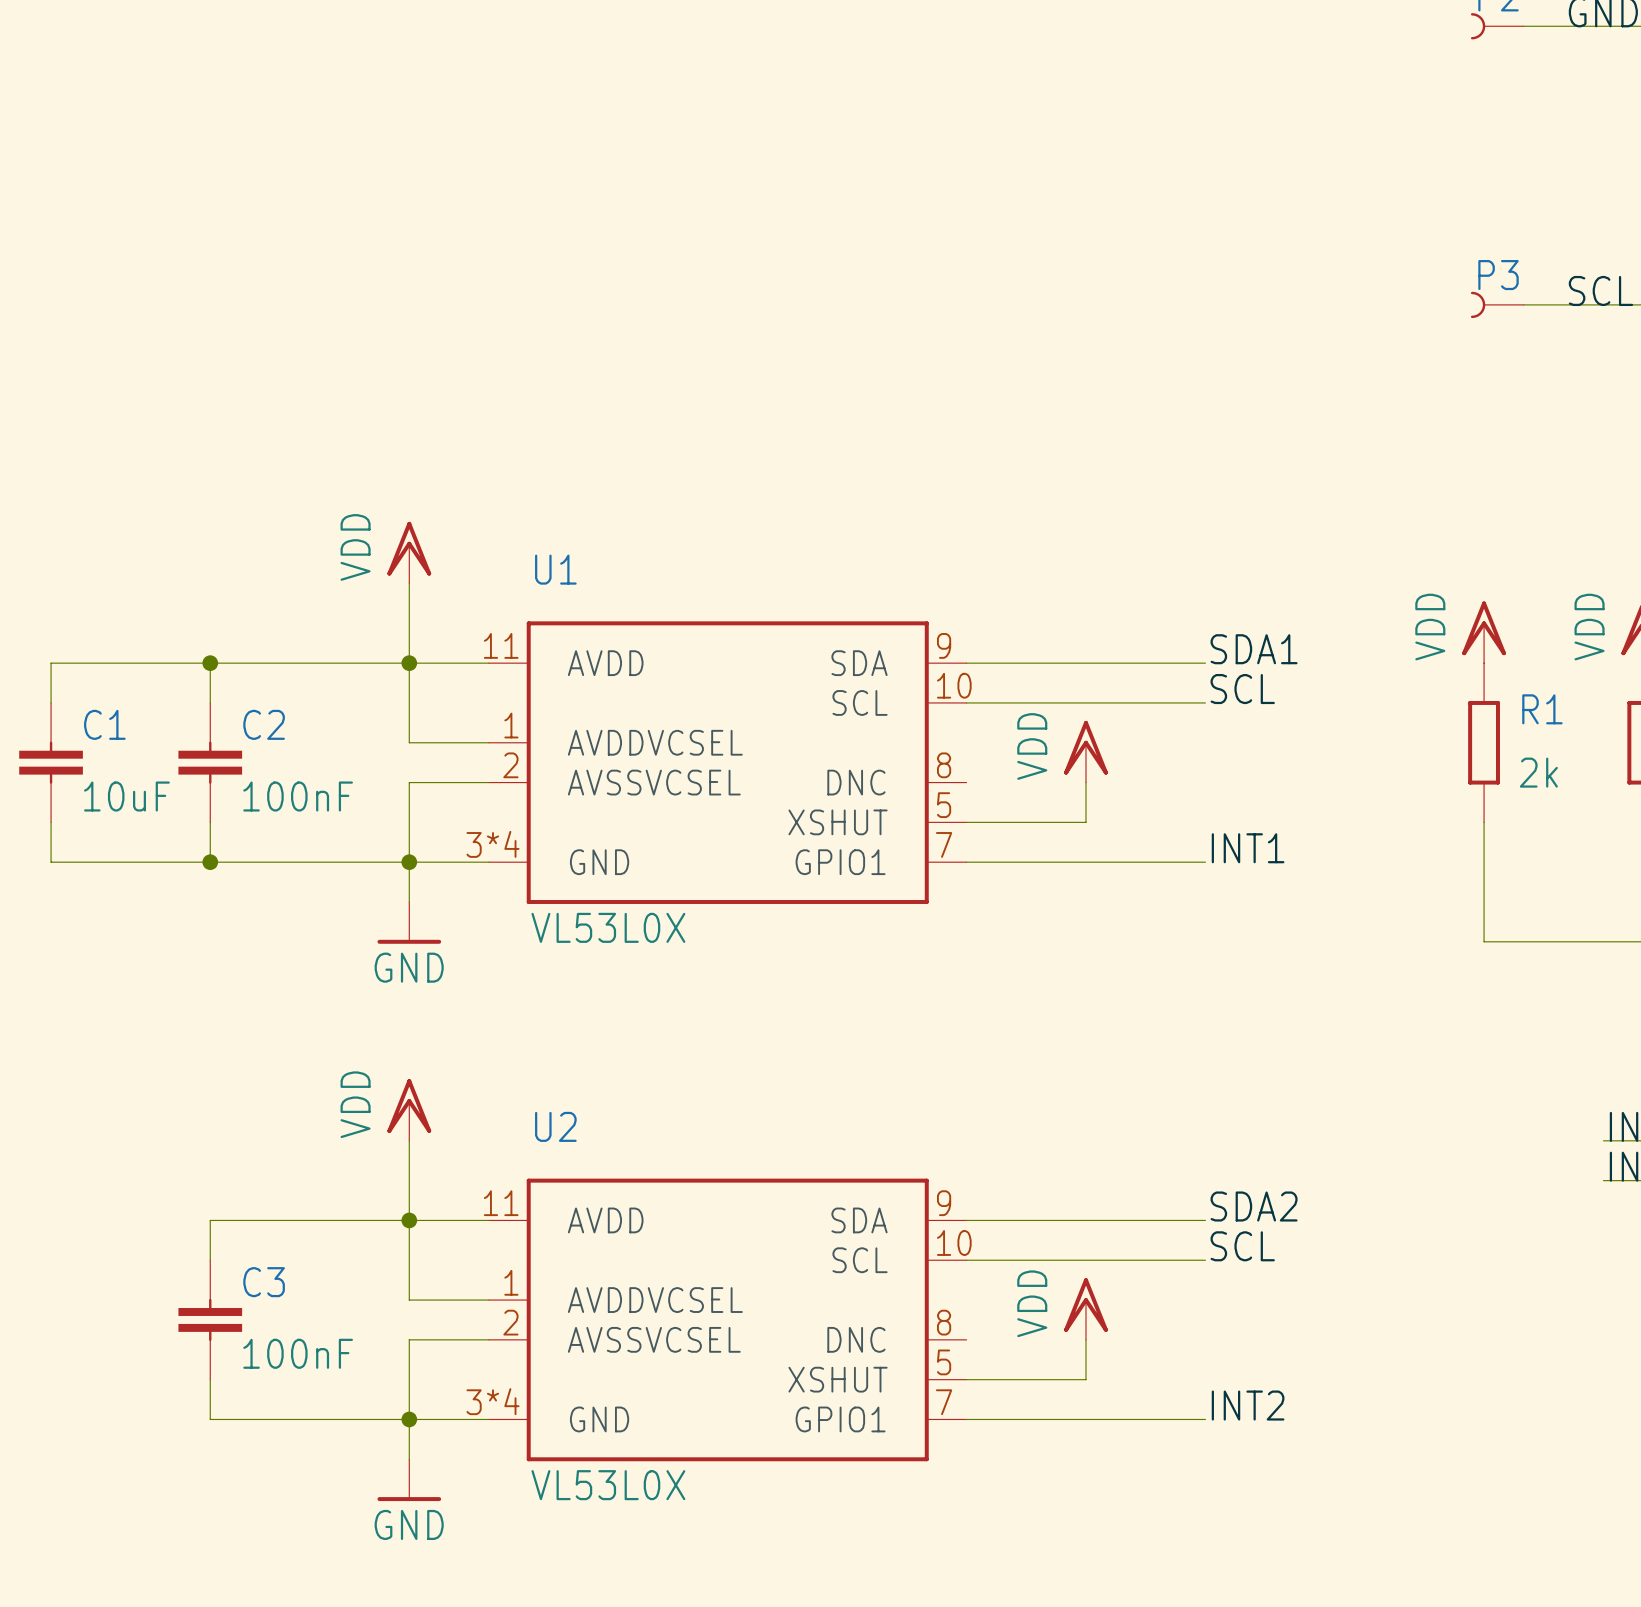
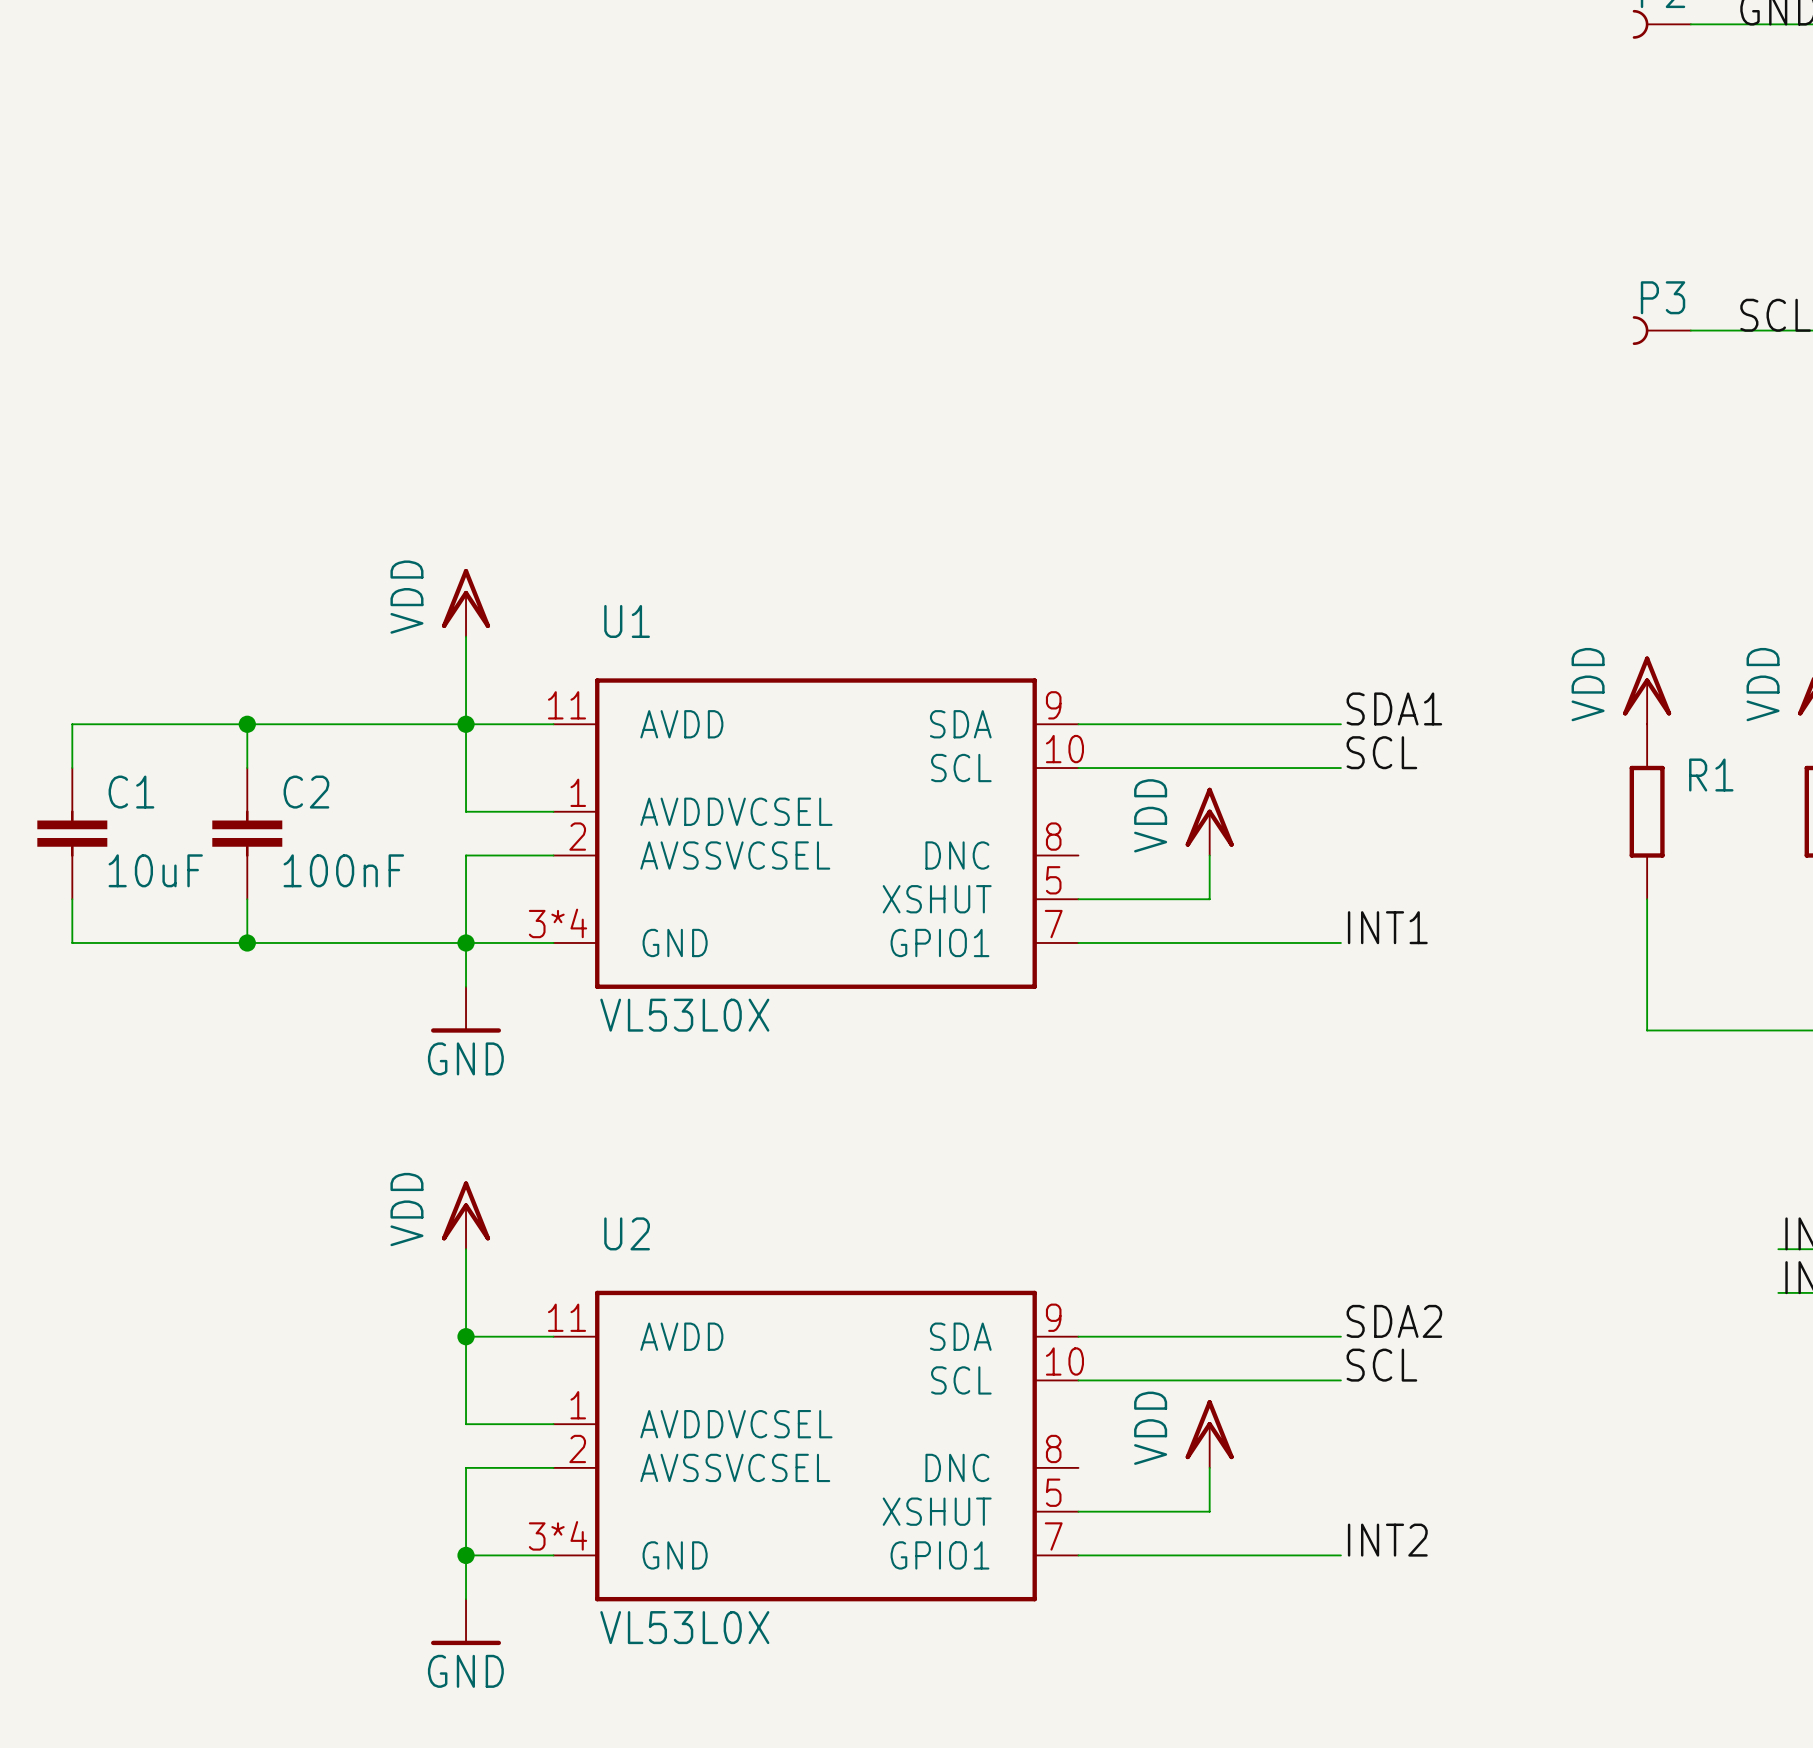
R1 value: 2k (1538, 772) -> none
wire: (409, 1220) (210, 1220) (210, 1260) -> none
C3: 100nF (210, 1319) -> none
wire: (210, 1379) (210, 1419) (409, 1419) -> none

